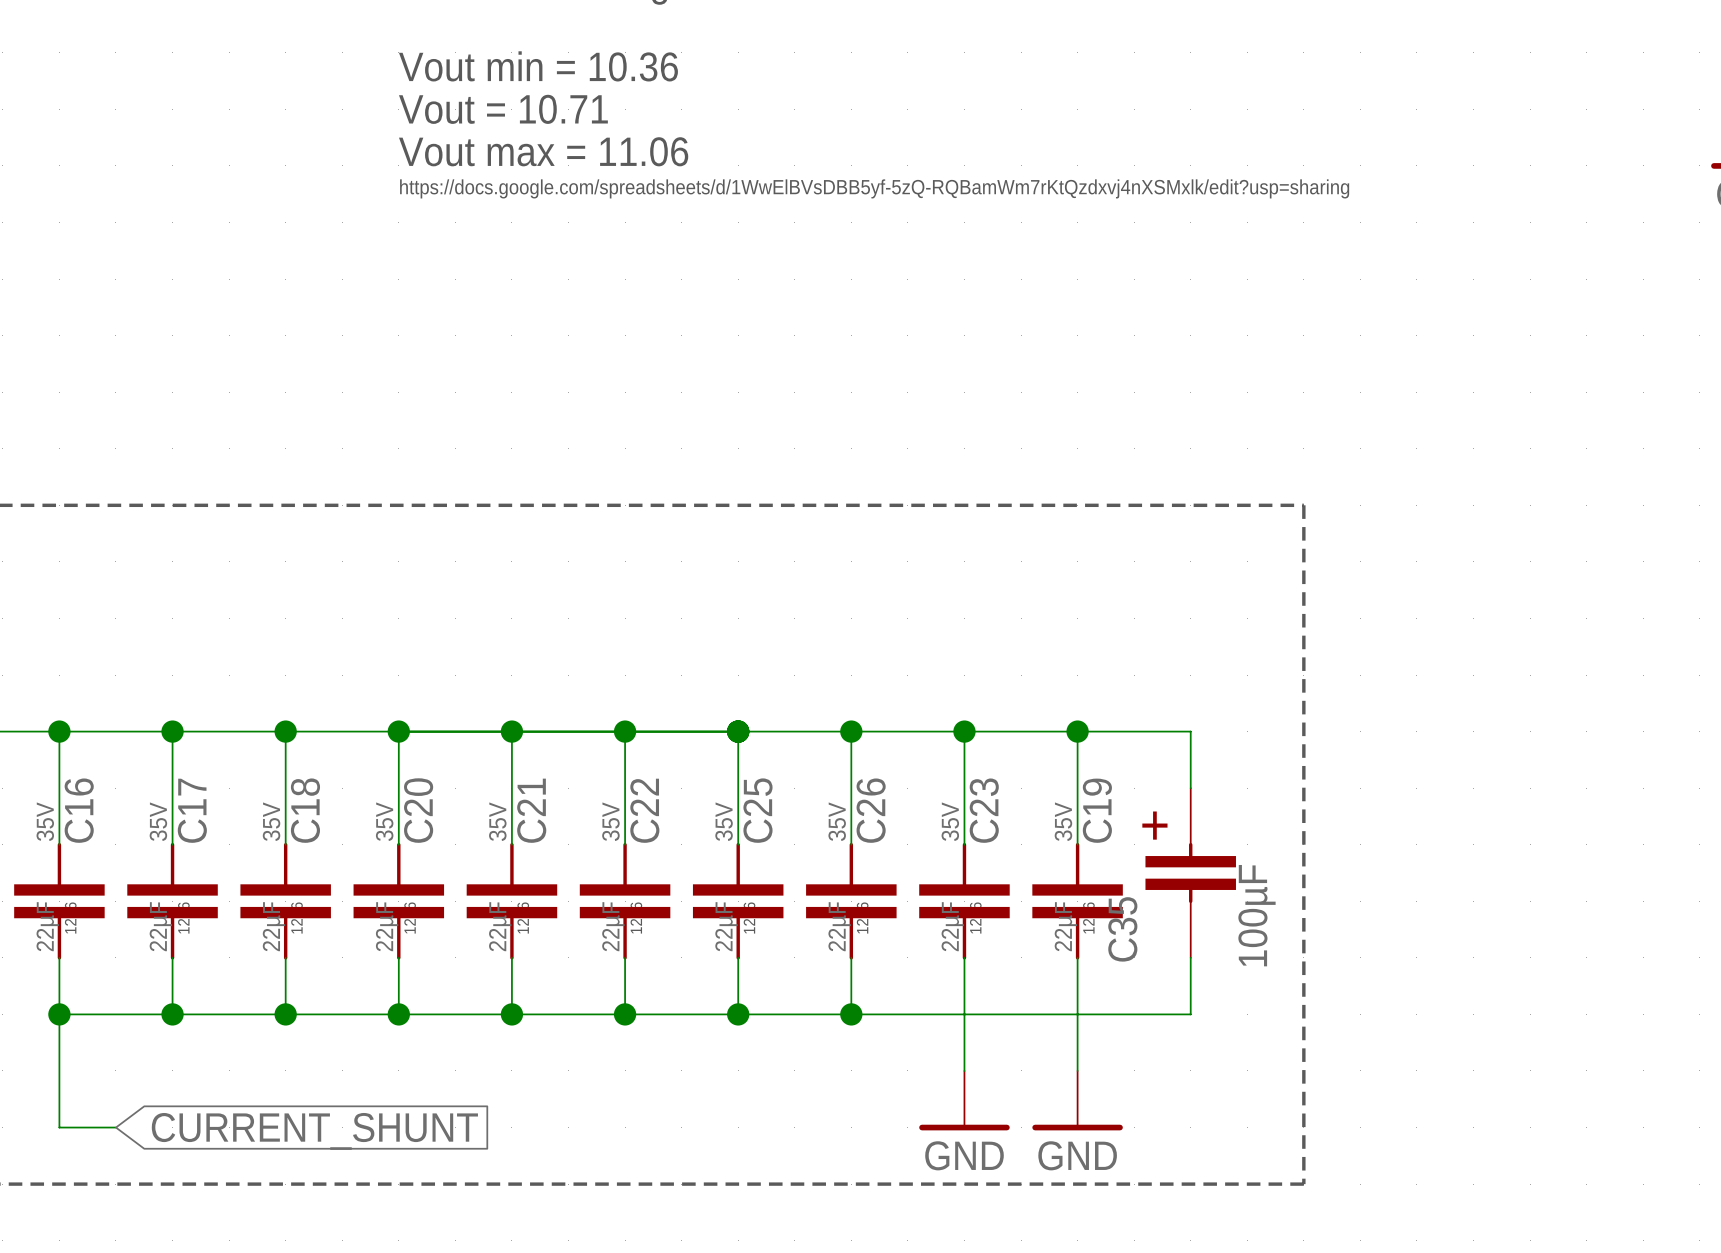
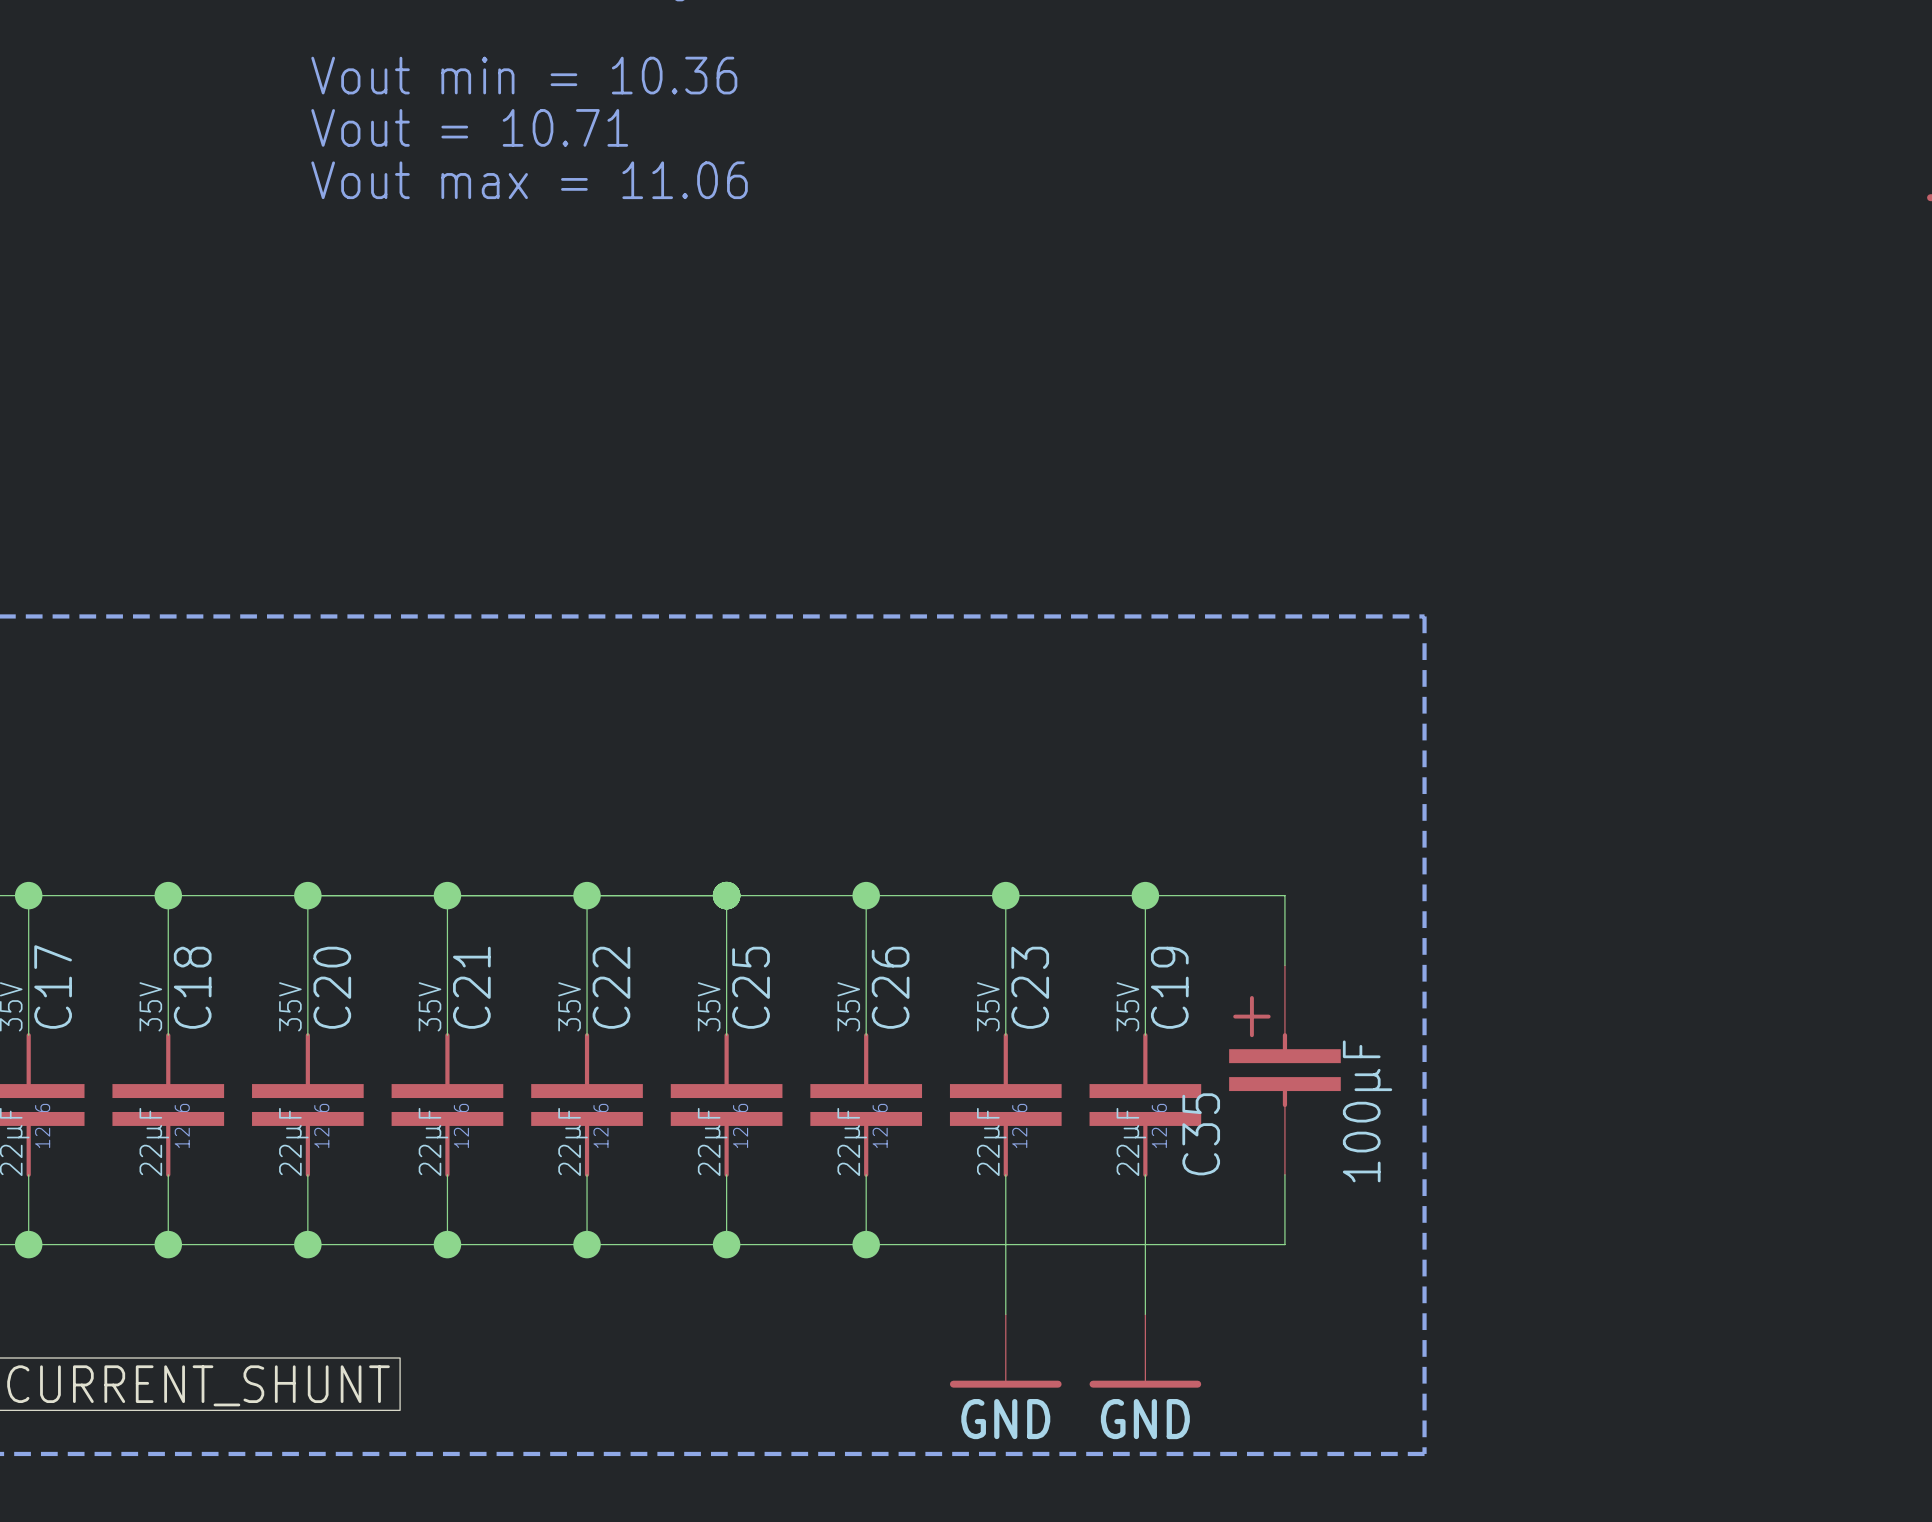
text: https://docs.google.com/spreadsheets/d/1WwElBVsDBB5yf-5zQ-RQBamWm7rKtQzdxvj4nXSMxlk/edit?usp=sharing (874, 188) -> none

